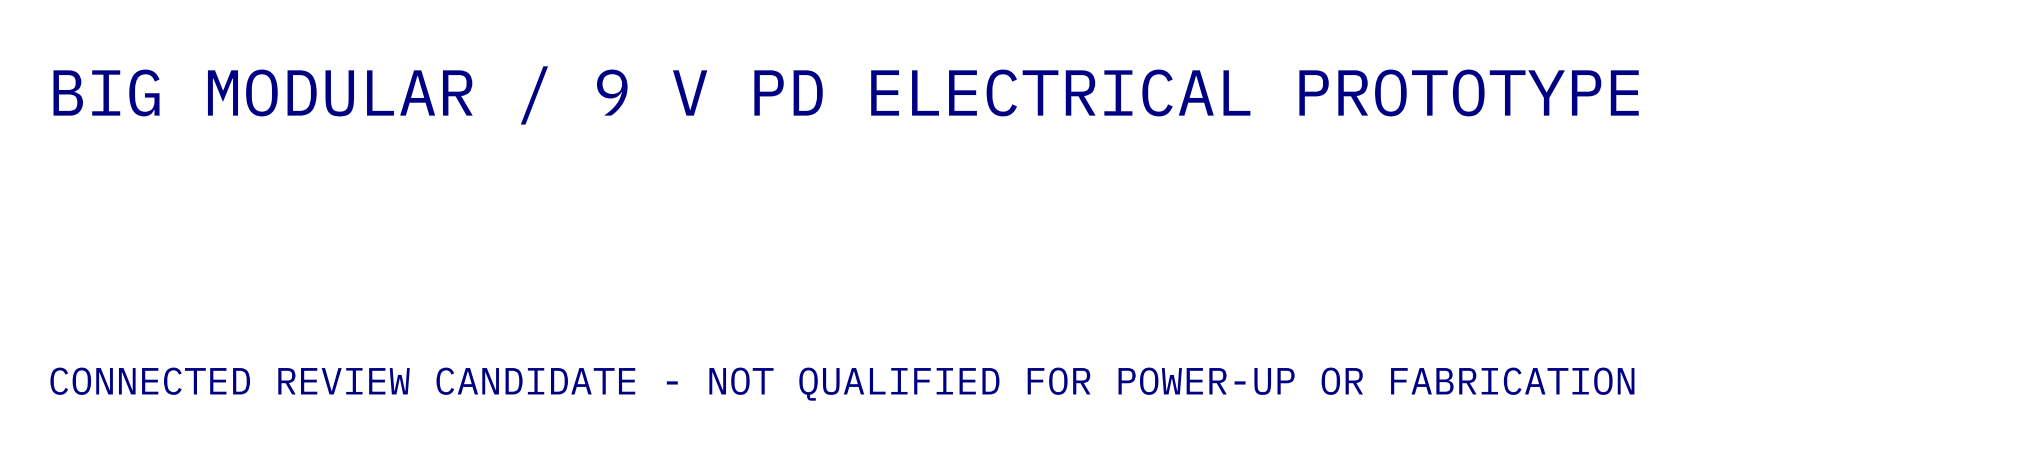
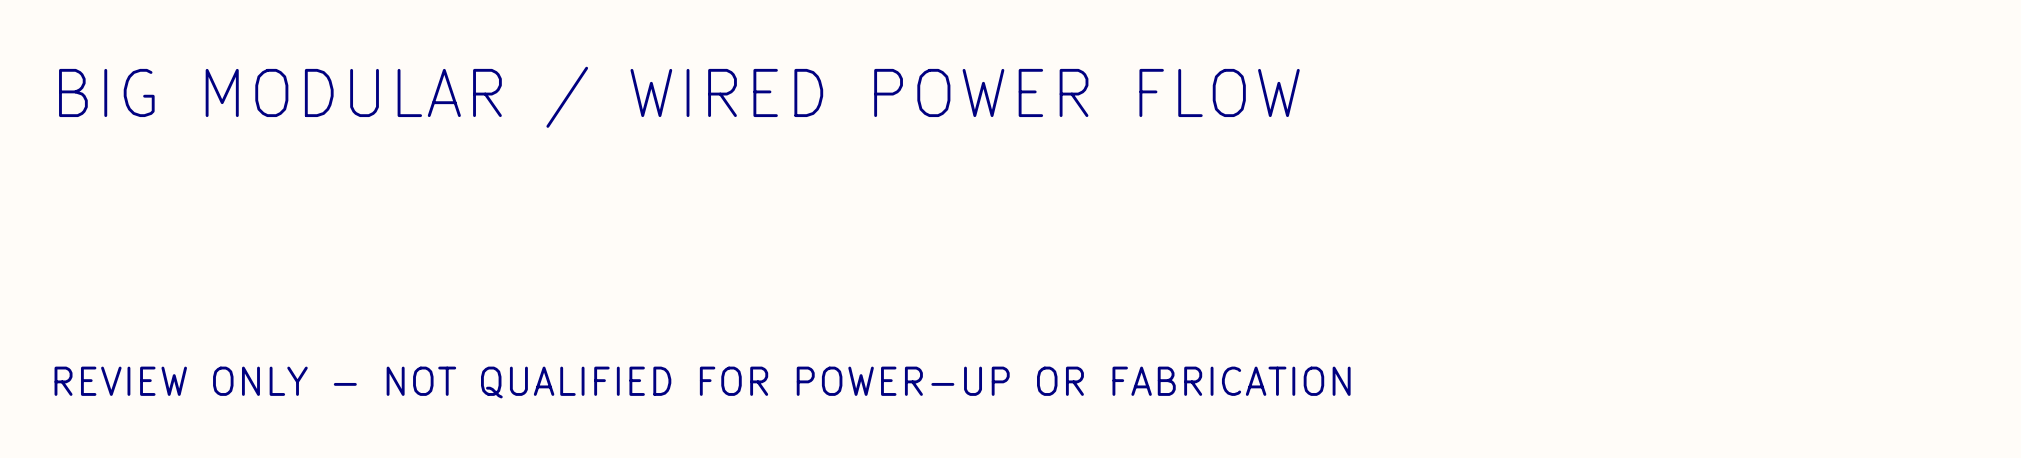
text: BIG MODULAR / 9 V PD ELECTRICAL PROTOTYPE (846, 95) -> BIG MODULAR / WIRED POWER FLOW (679, 97)
text: CONNECTED REVIEW CANDIDATE - NOT QUALIFIED FOR POWER-UP OR FABRICATION (842, 384) -> REVIEW ONLY - NOT QUALIFIED FOR POWER-UP OR FABRICATION (702, 382)

